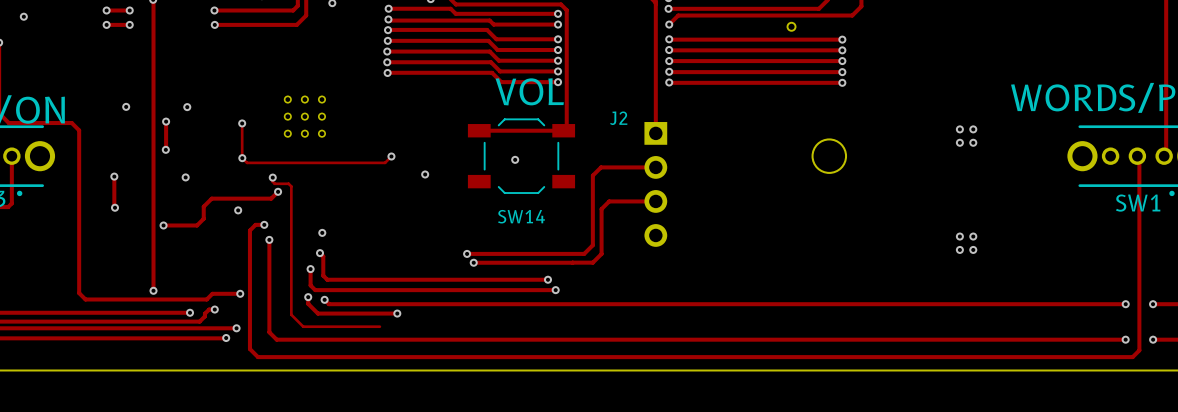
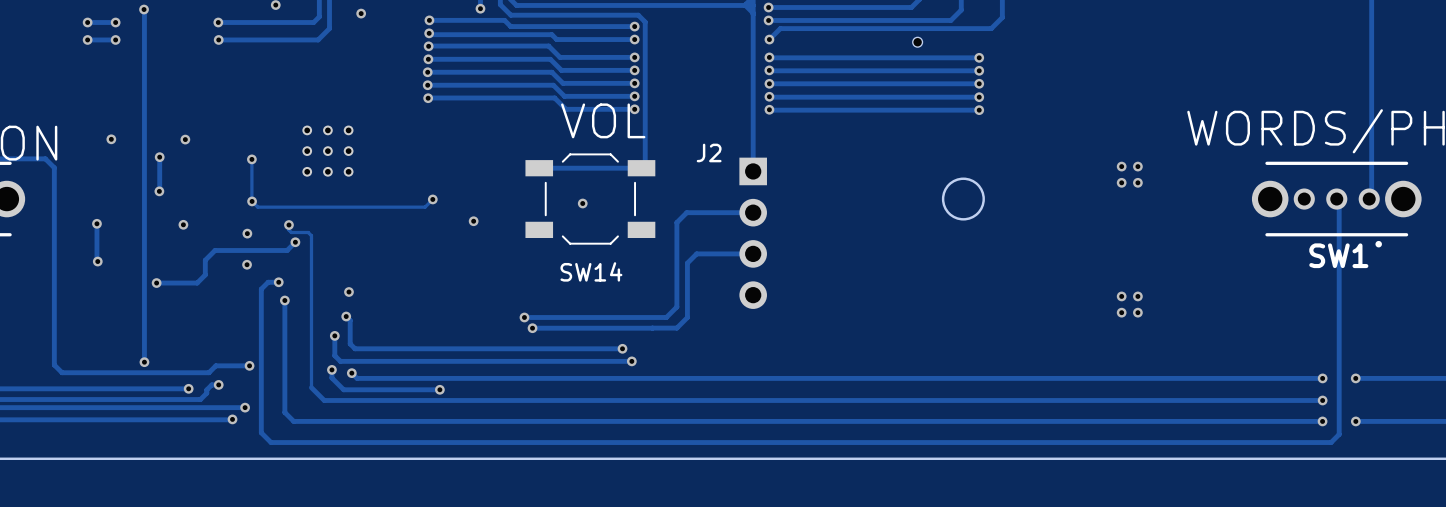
via: none -> (247, 233)
track: (291, 311) (291, 314) (303, 326) (379, 326) -> (311, 387) (324, 400) (1322, 400)
via: none -> (1322, 400)

